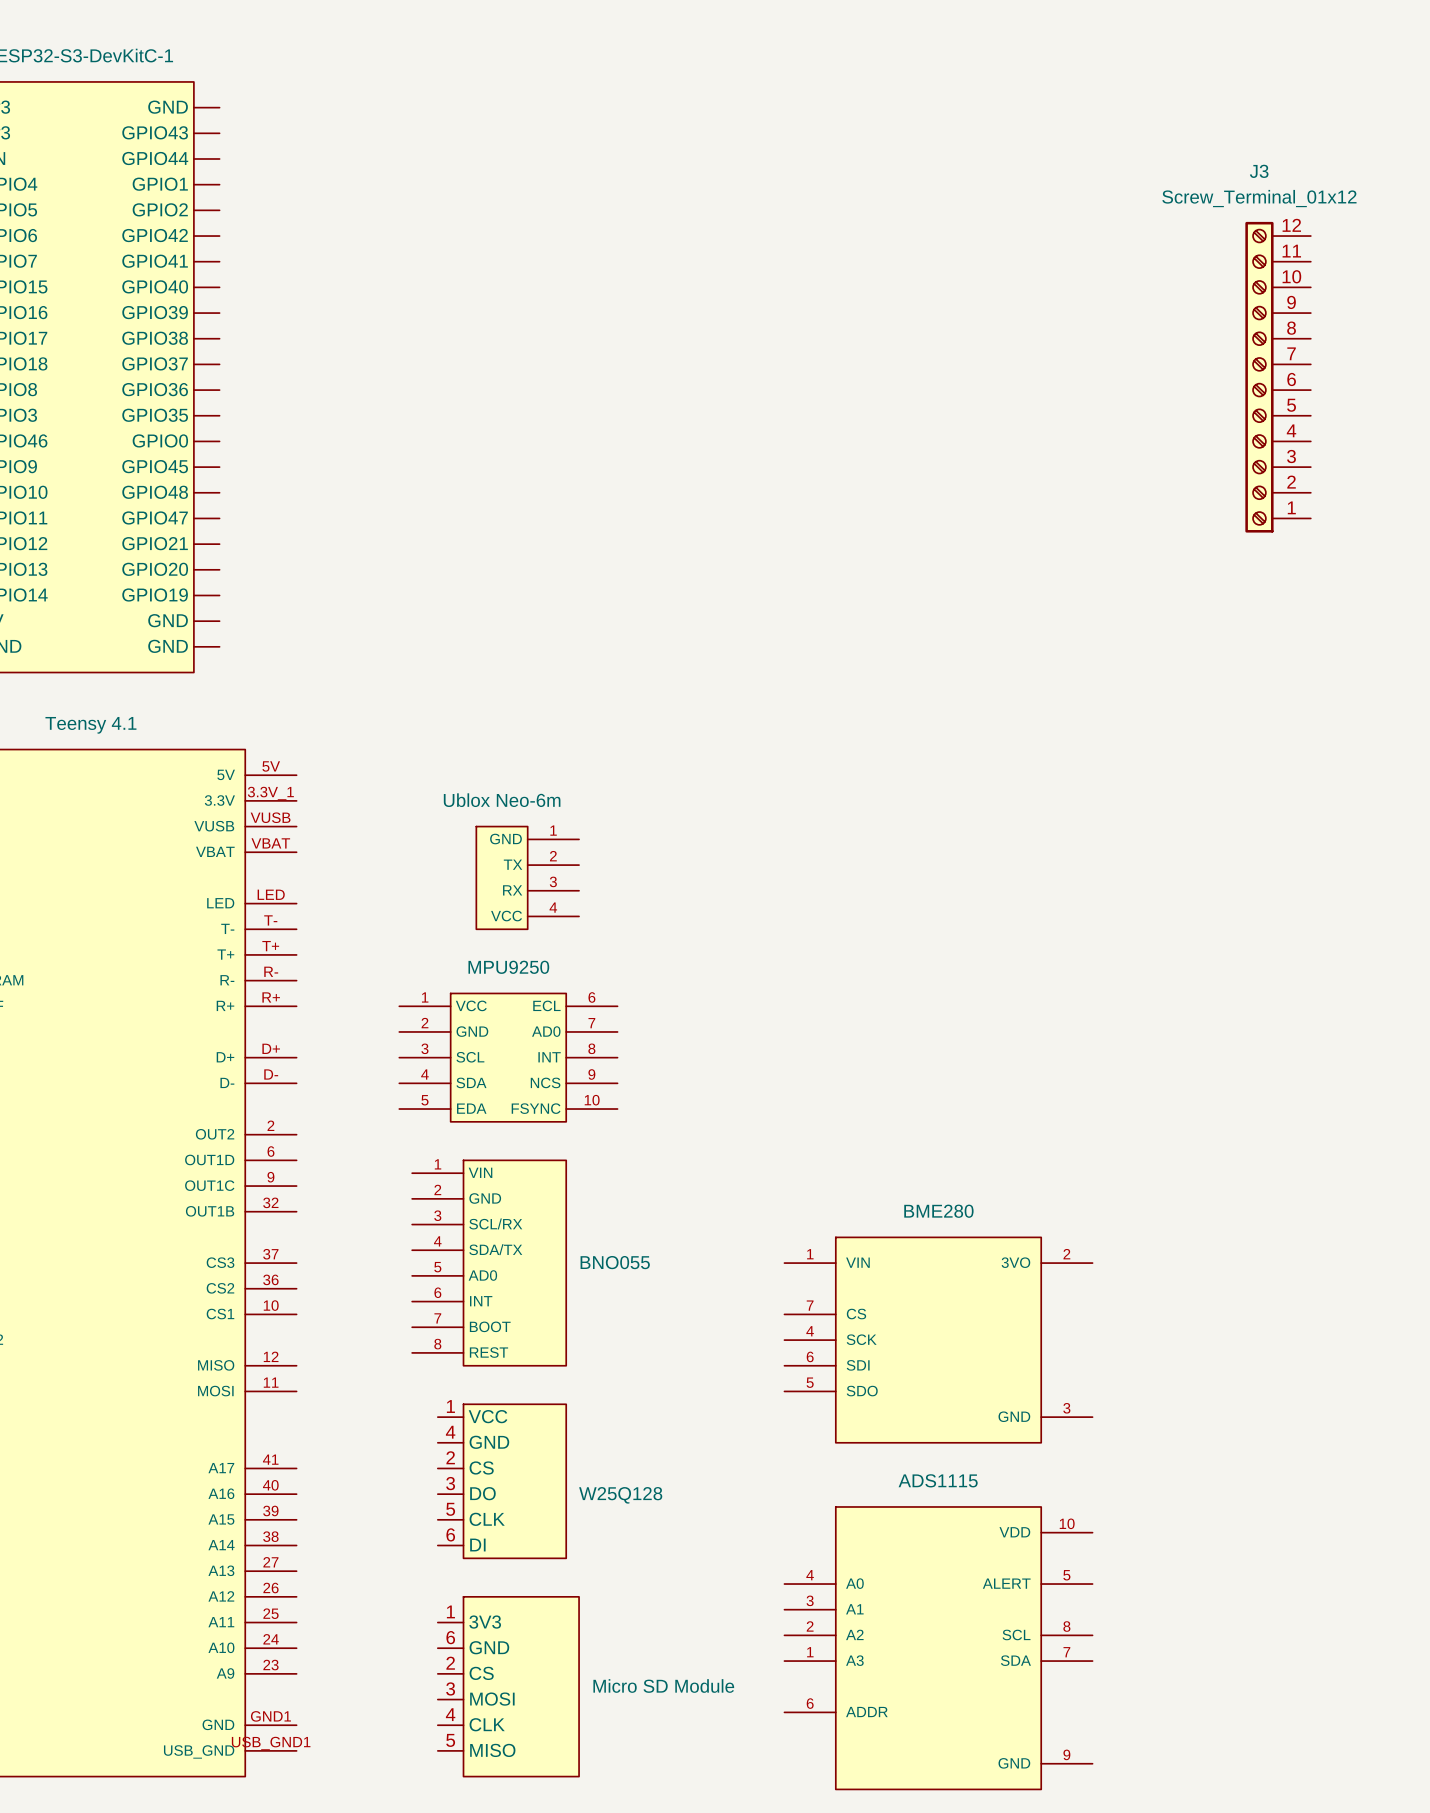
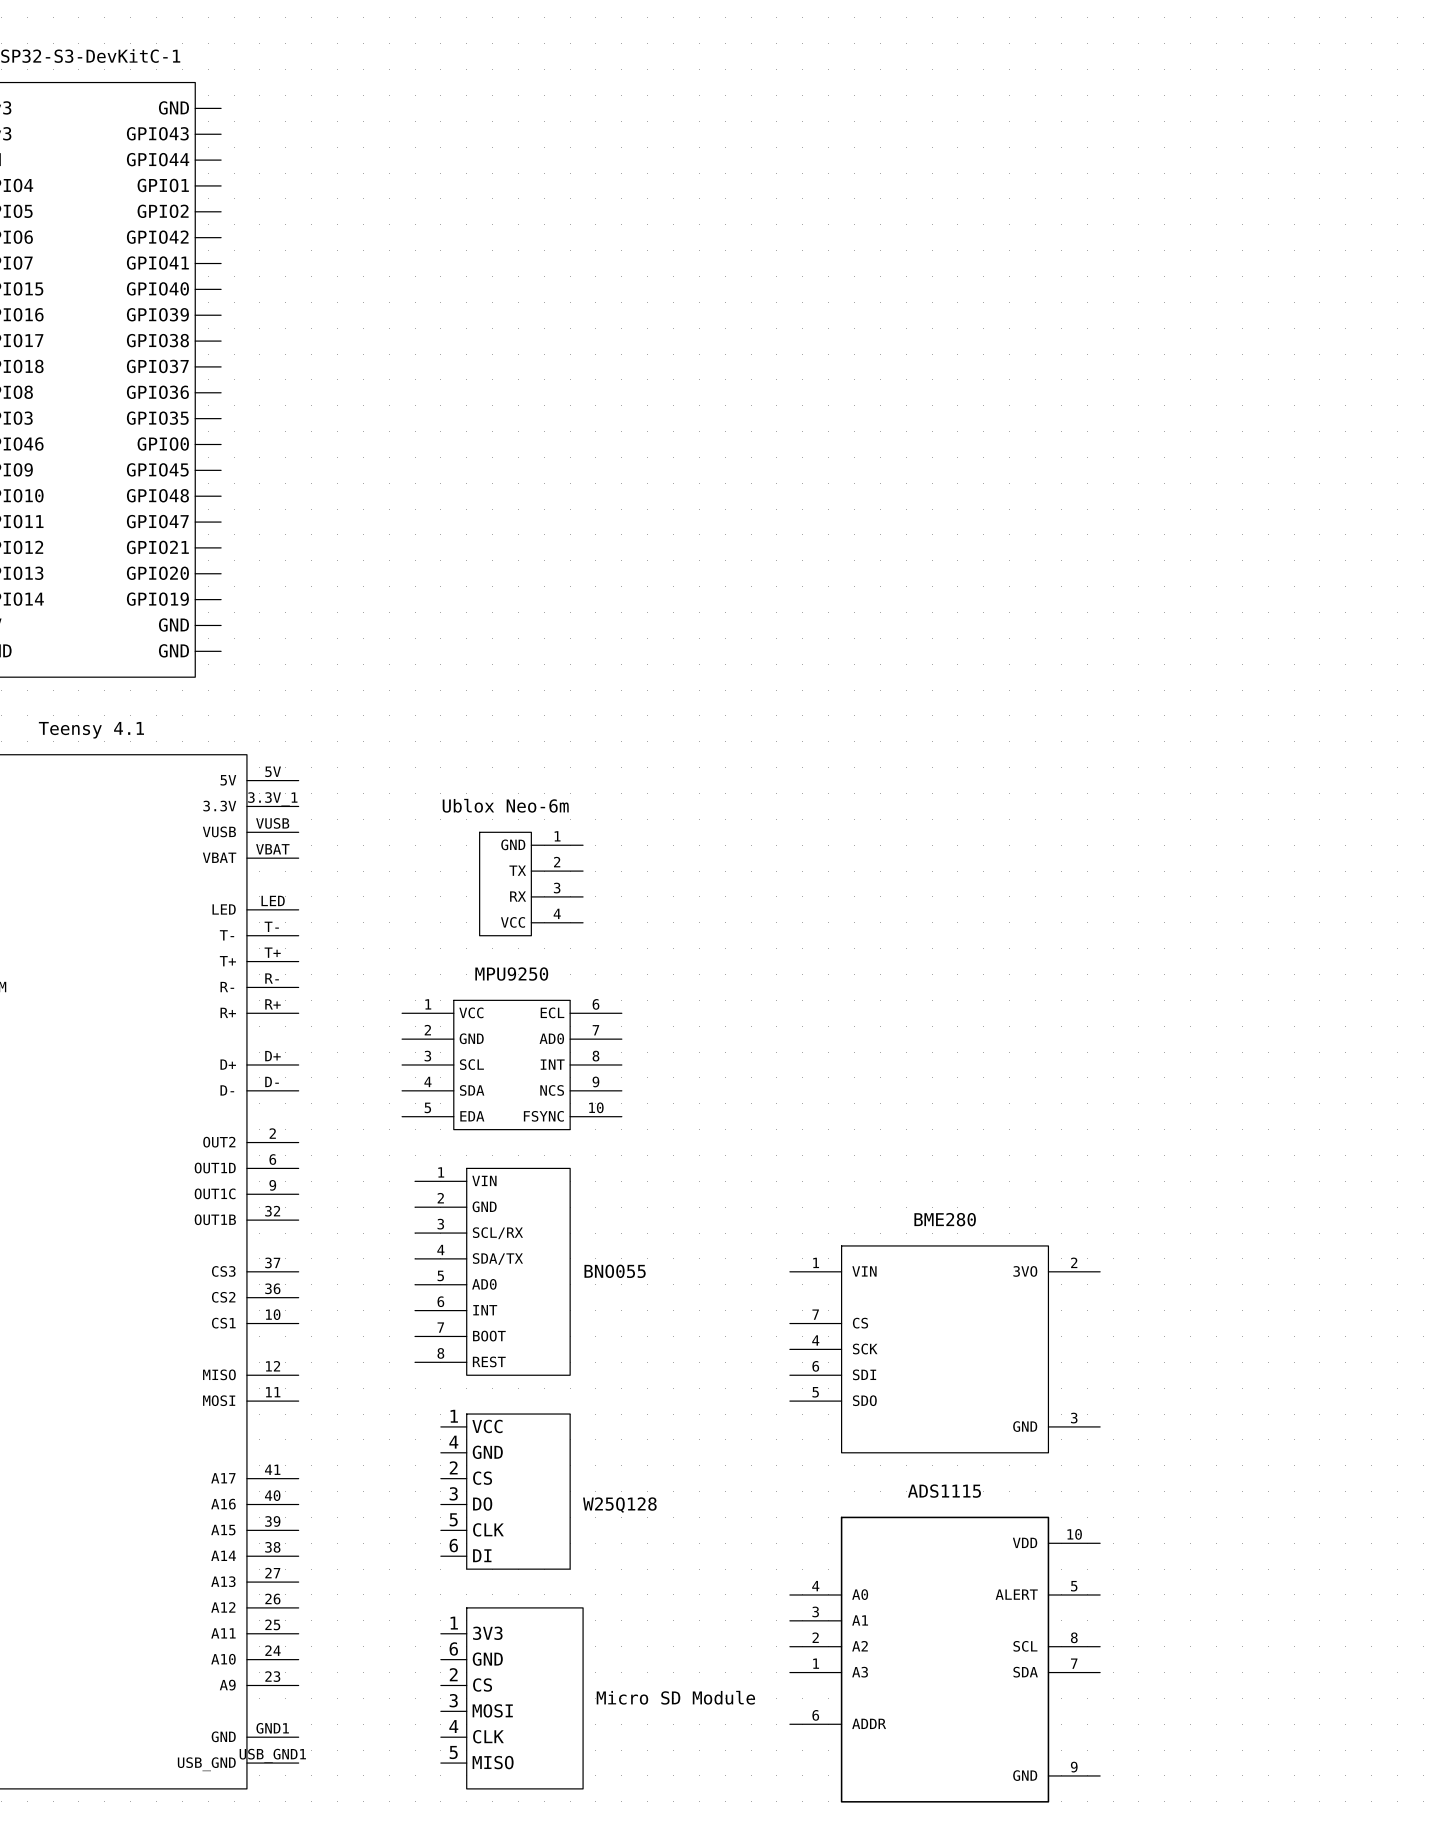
J3: Screw_Terminal_01x12 (1278, 377) -> none

